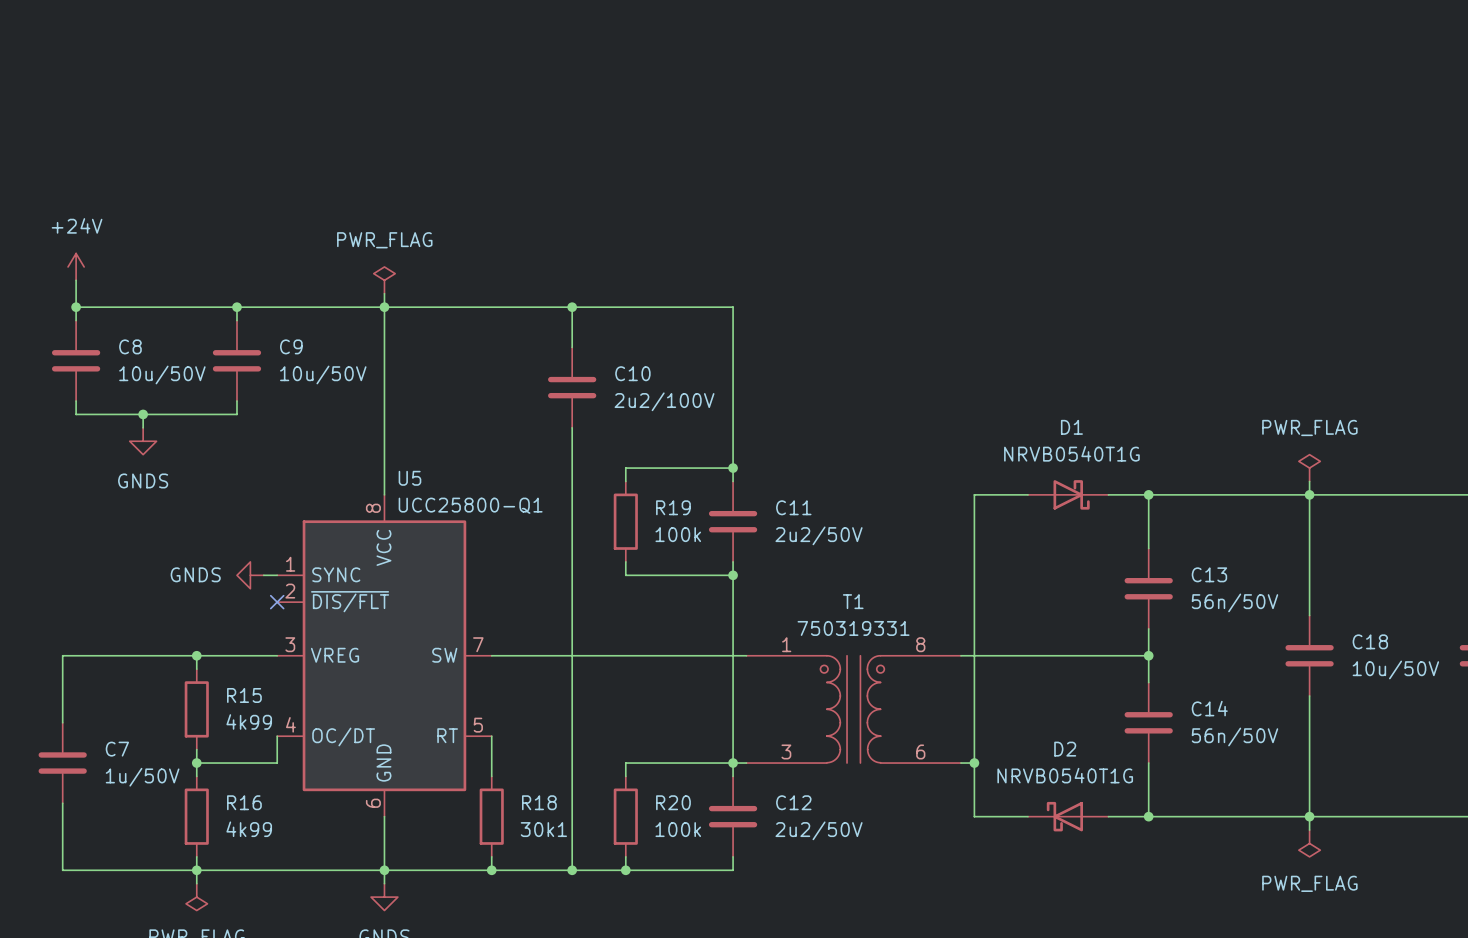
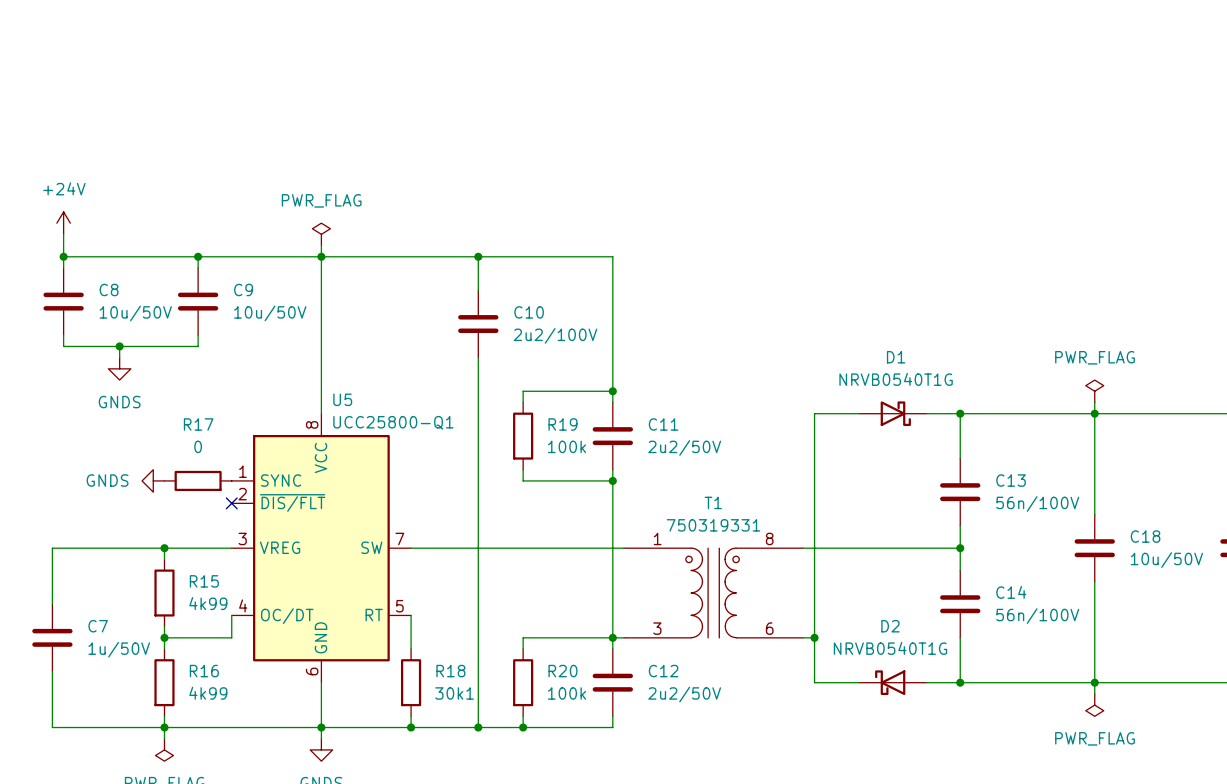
R17: none -> 0 (198, 480)
power symbol position: GNDS (250, 575) -> GNDS (153, 480)
C13 value: 56n/50V (1234, 602) -> 56n/100V (1037, 504)
C14 value: 56n/50V (1234, 736) -> 56n/100V (1037, 616)

